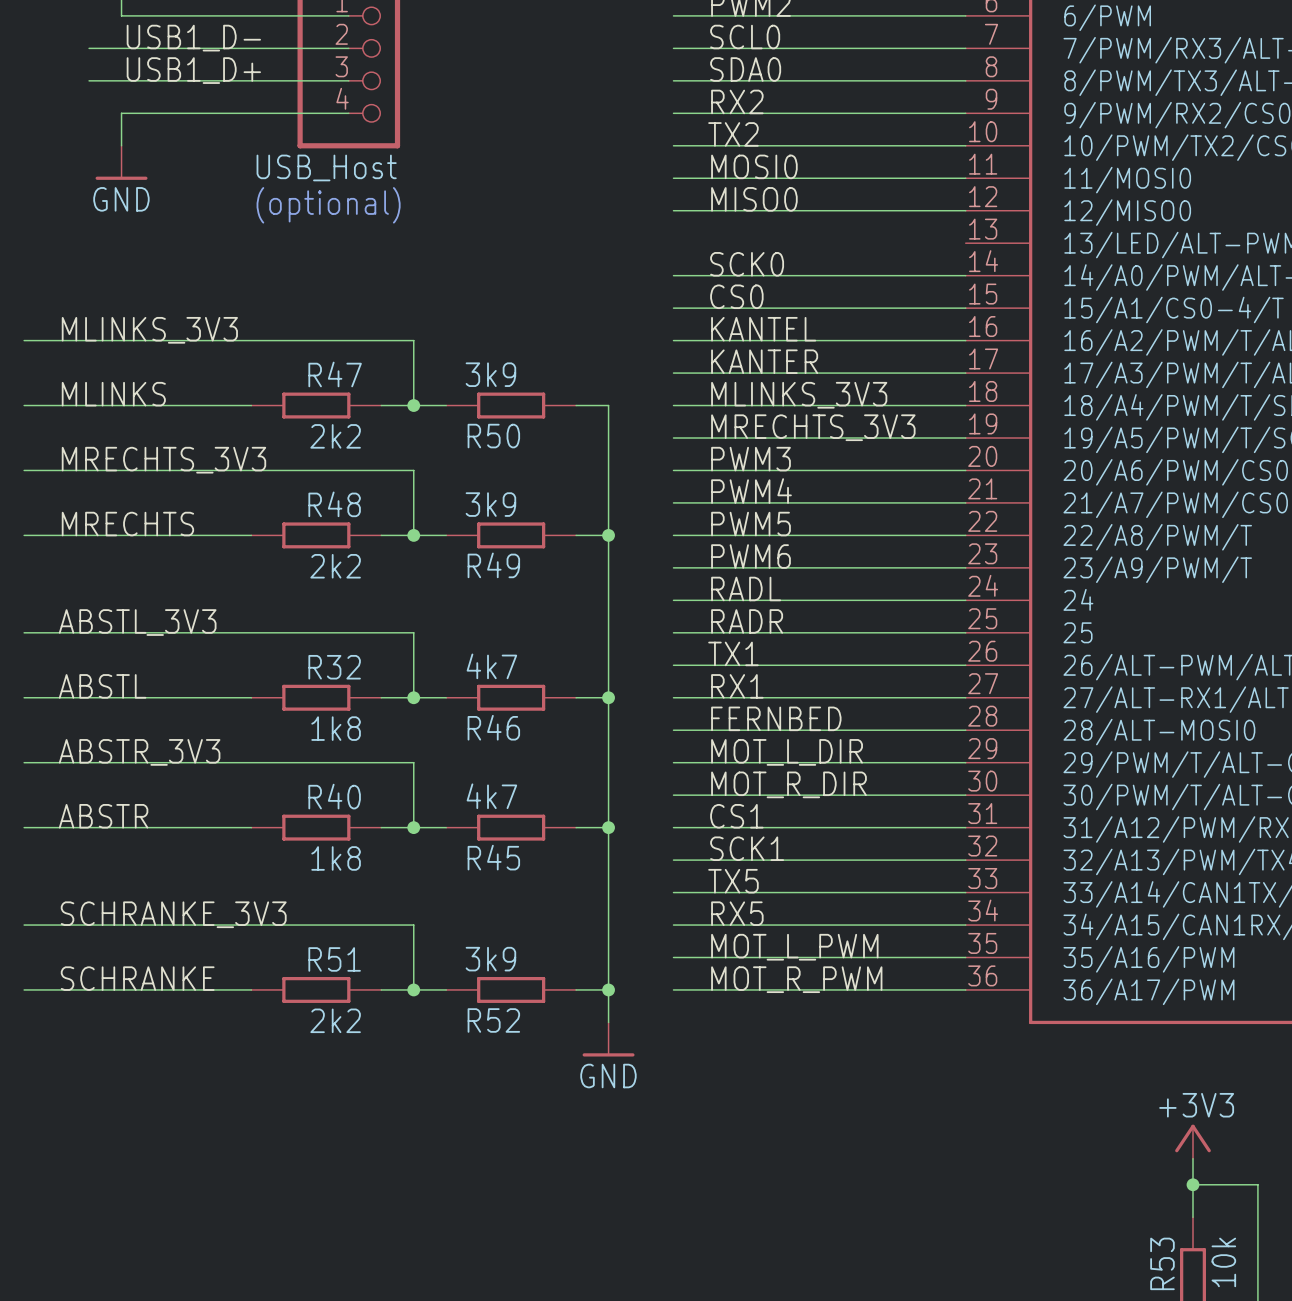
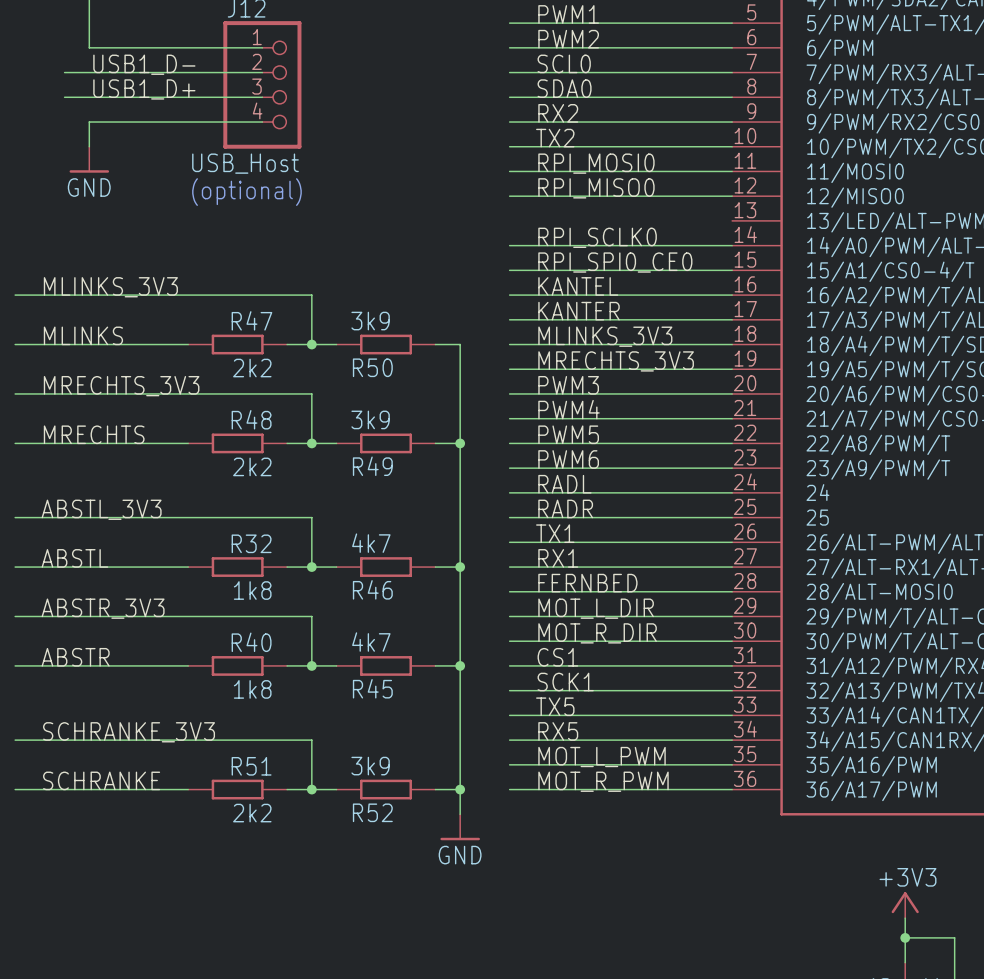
label: MOSI0 (754, 166) -> RPI_MOSI0 (596, 163)
label: MISO0 (754, 199) -> RPI_MISO0 (596, 188)
label: SCK0 (747, 264) -> RPI_SCLK0 (597, 237)
label: CS0 (736, 296) -> RPI_SPI0_CE0 (615, 262)

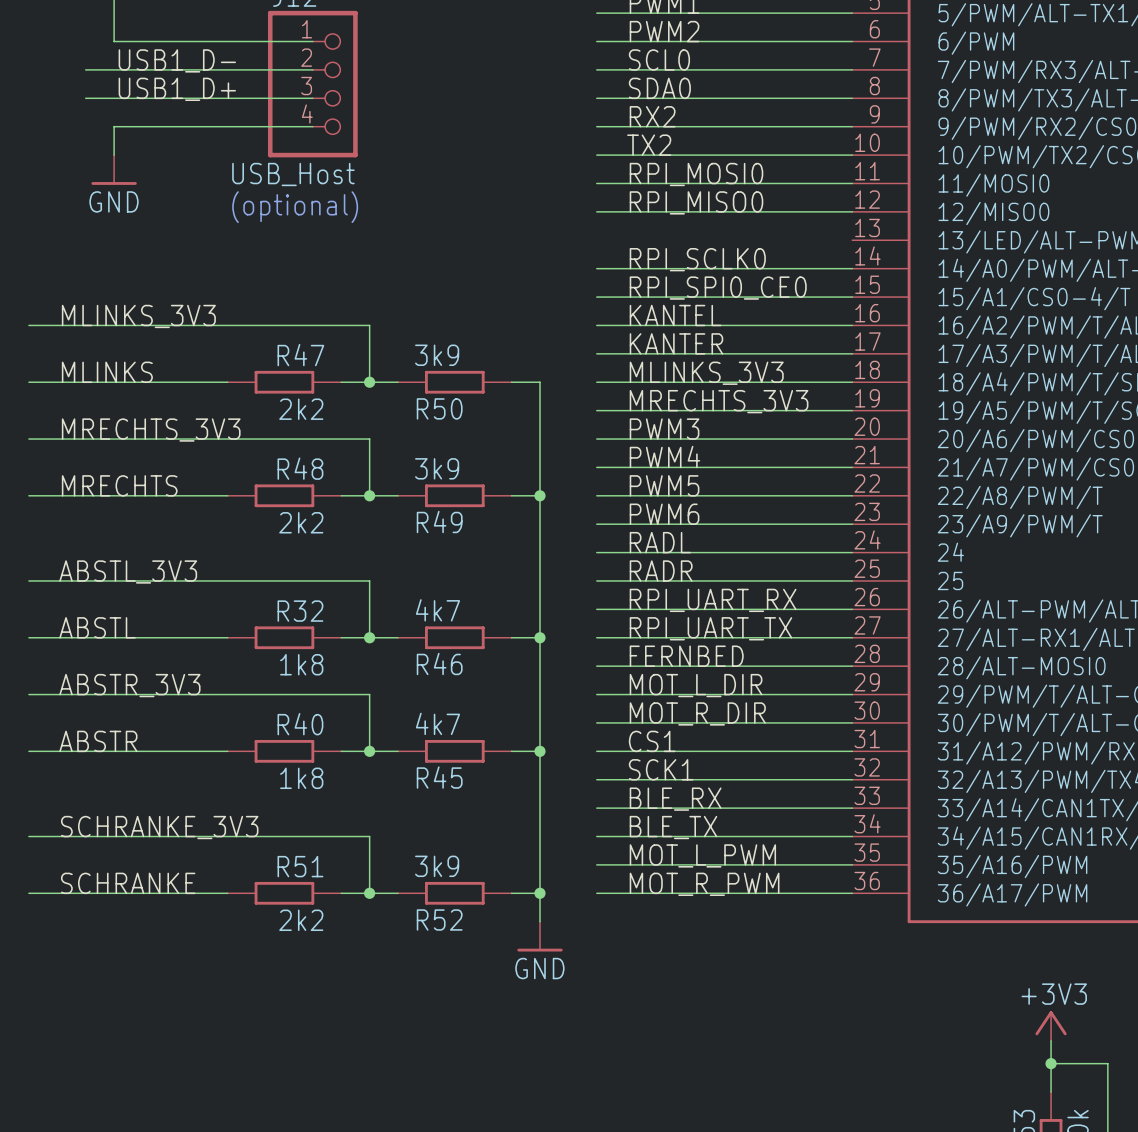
label: TX1 (555, 533) -> RPI_UART_RX (713, 600)
label: RX1 (558, 558) -> RPI_UART_TX (710, 628)
label: TX5 (555, 706) -> BLE_RX (675, 799)
label: RX5 (558, 731) -> BLE_TX (673, 827)

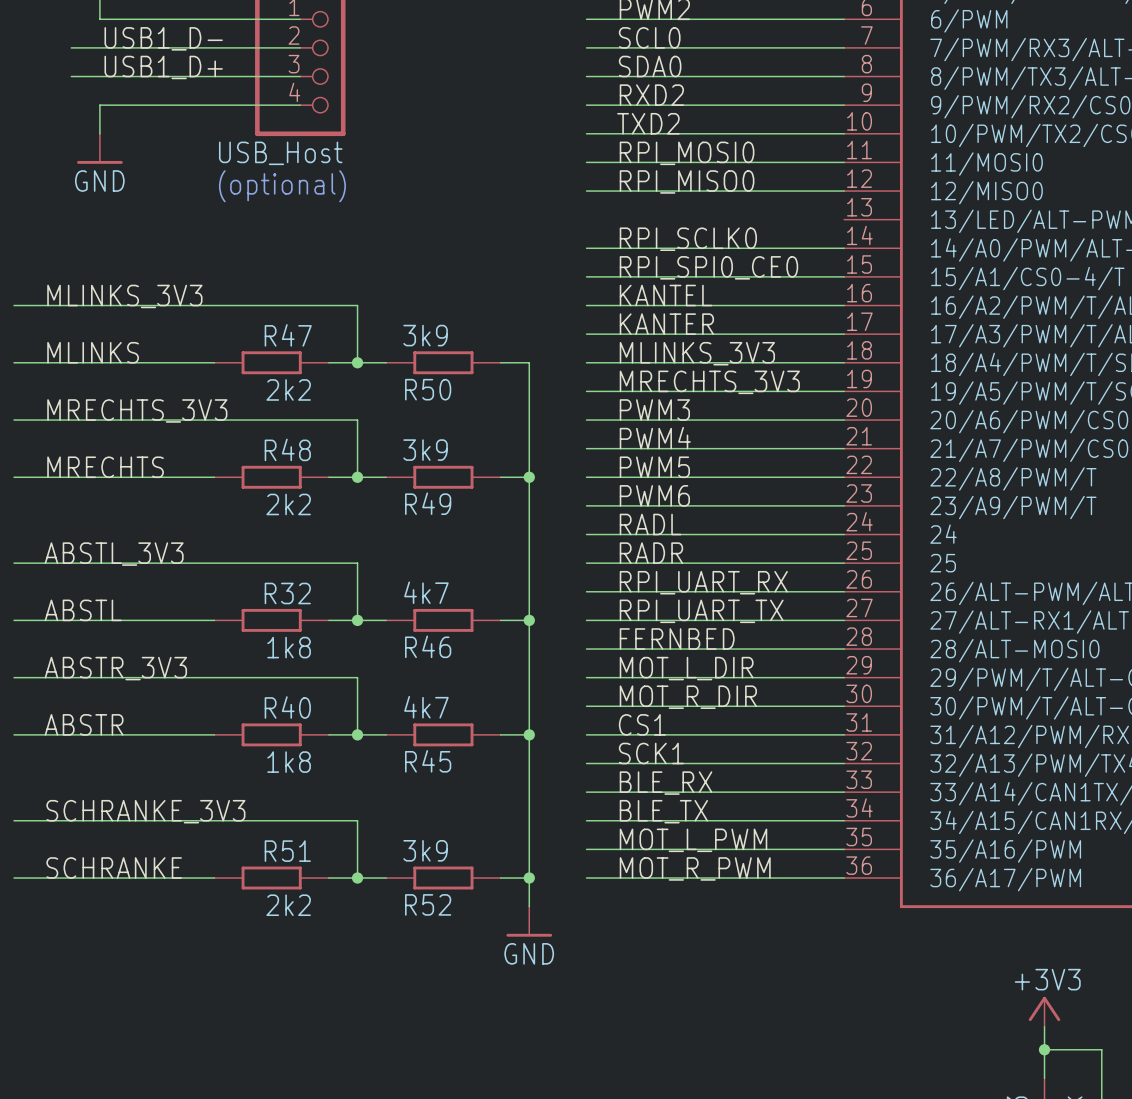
label: RX2 (652, 116) -> RXD2 (651, 95)
label: TX2 (649, 145) -> TXD2 (648, 123)

